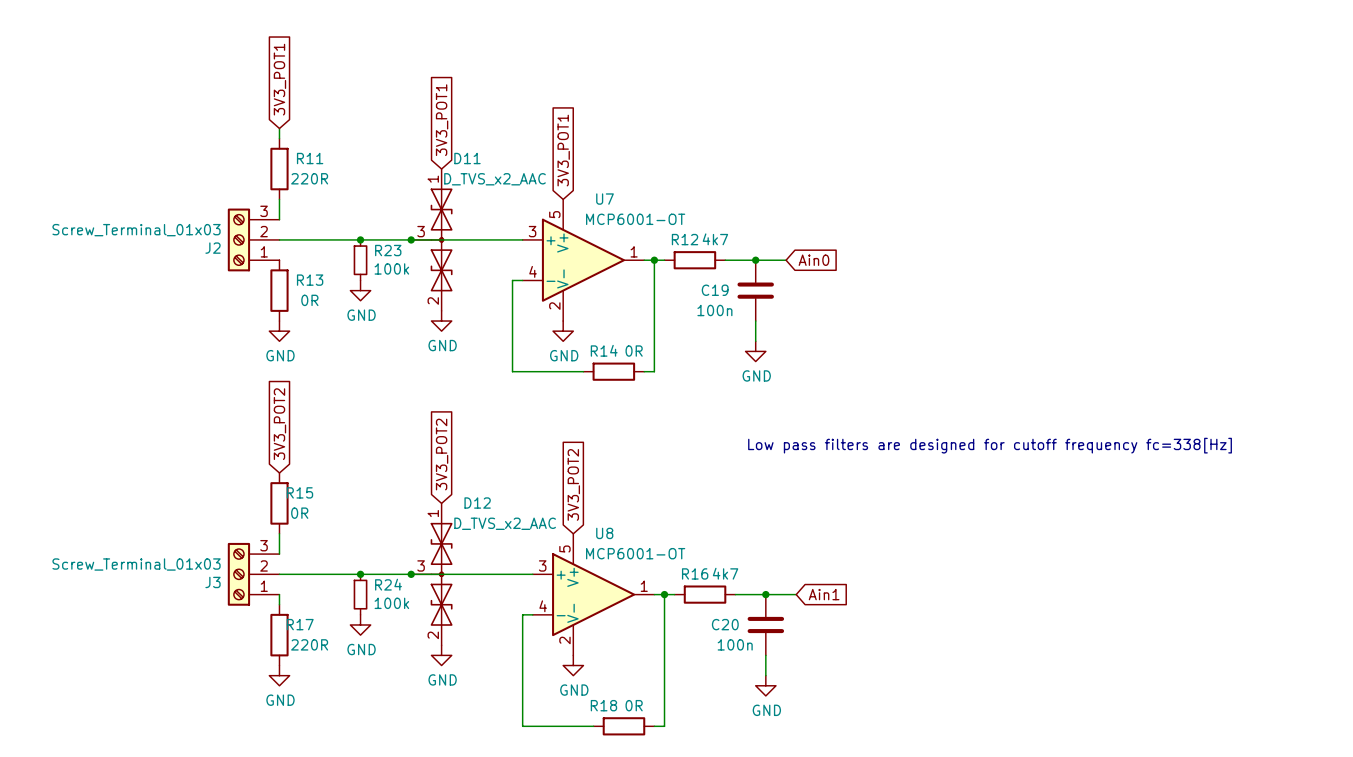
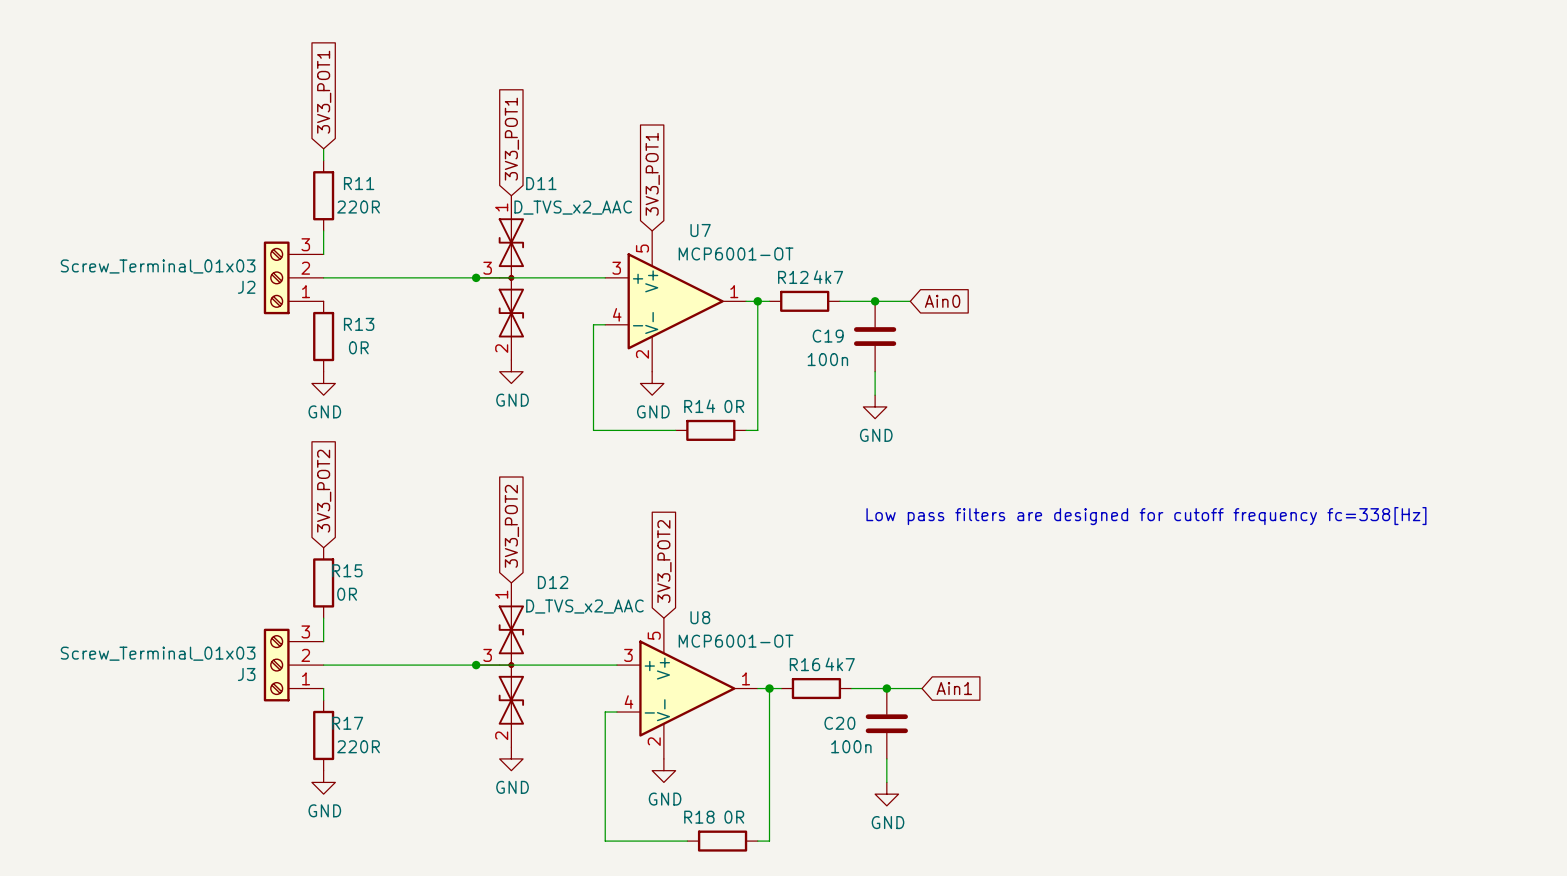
junction: (360, 239) -> none
R23: 100k (360, 260) -> none
power symbol: GND (360, 290) -> none
junction: (360, 574) -> none
R24: 100k (360, 594) -> none
power symbol: GND (360, 624) -> none

